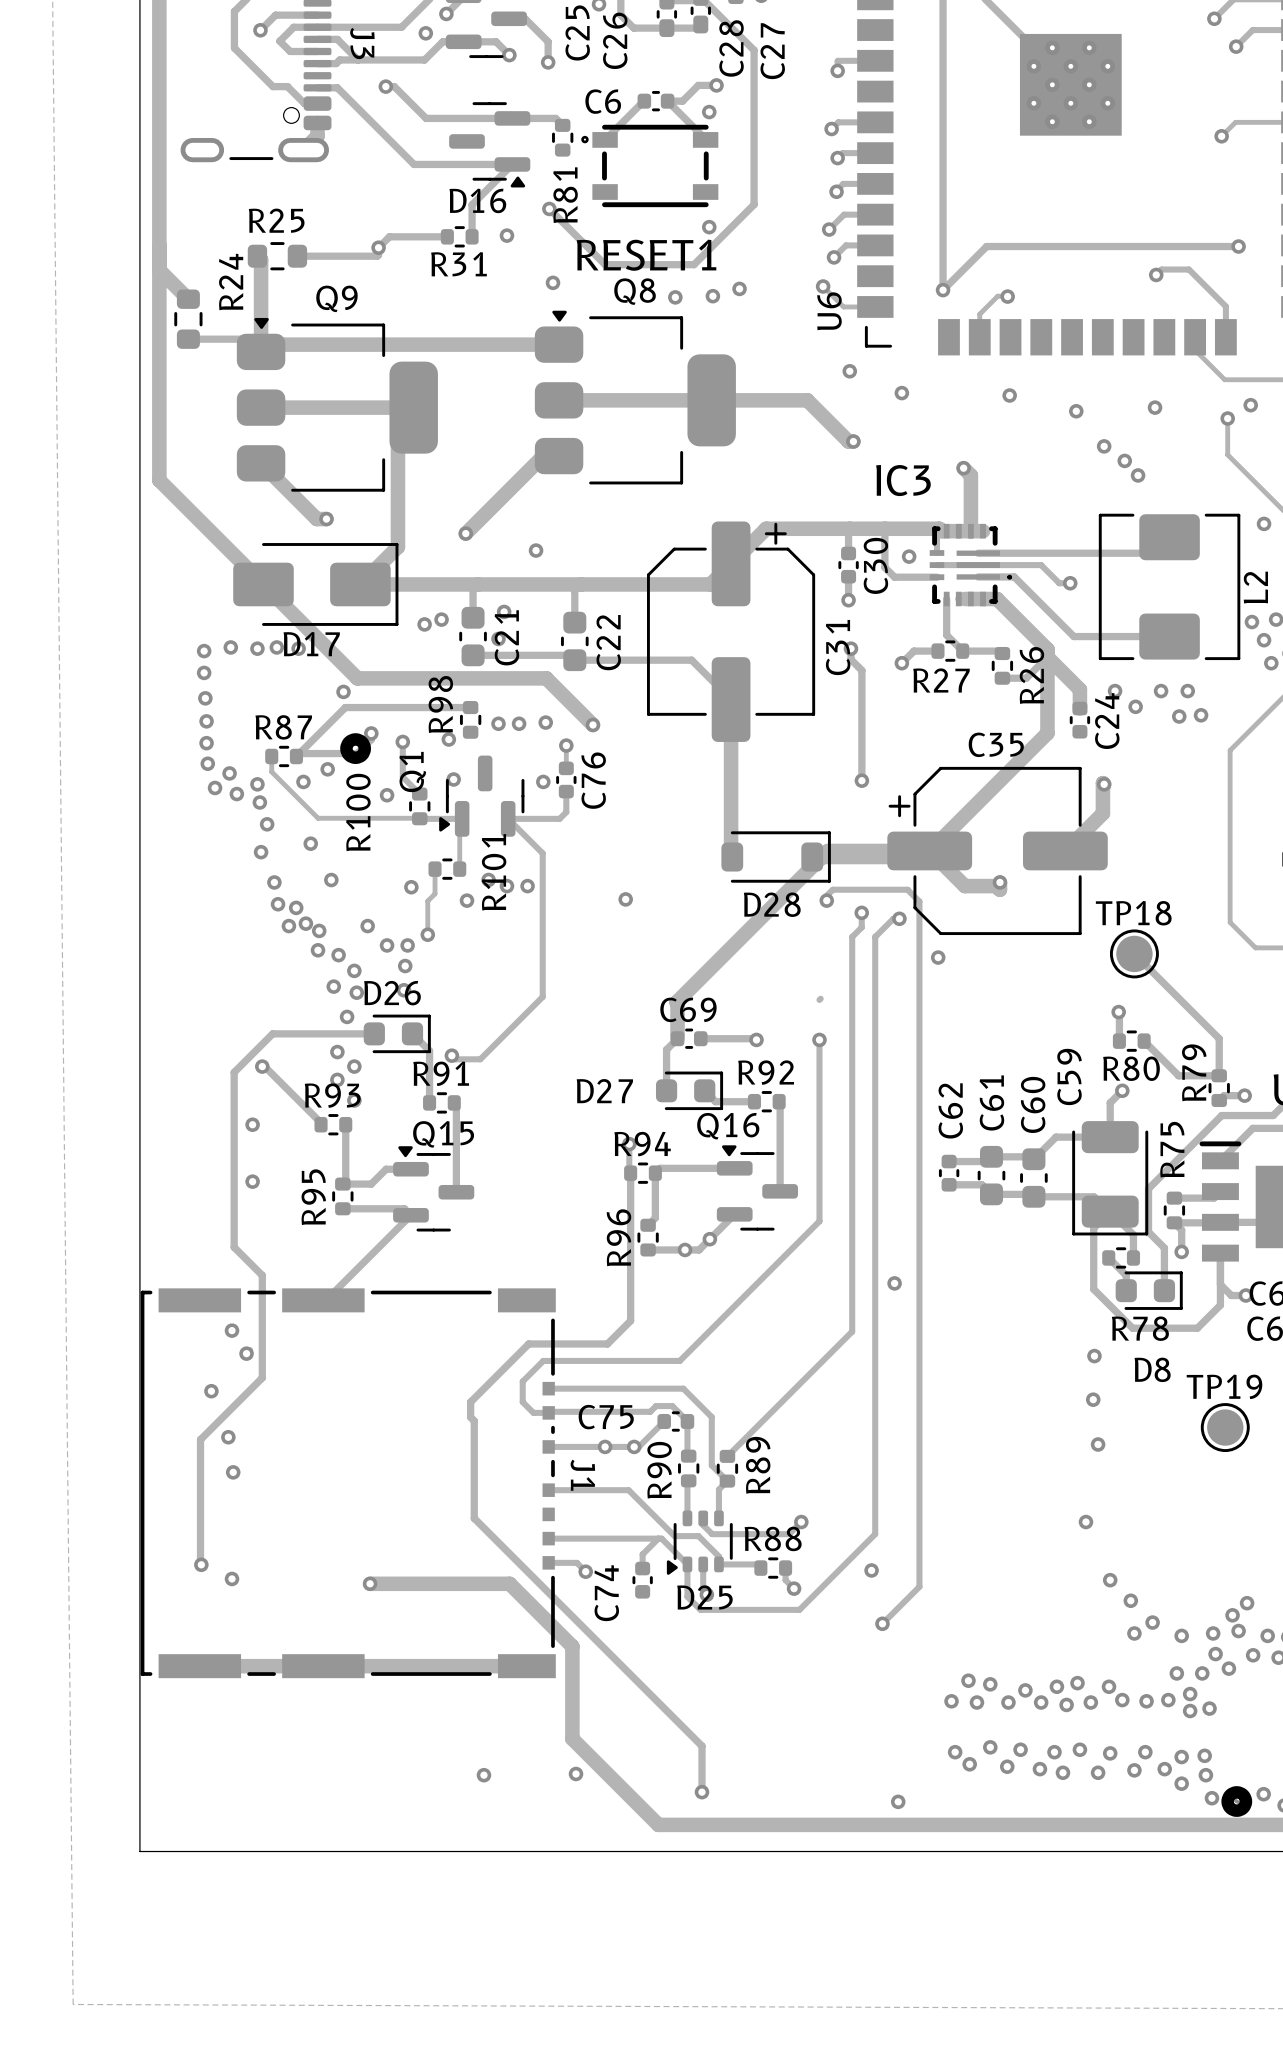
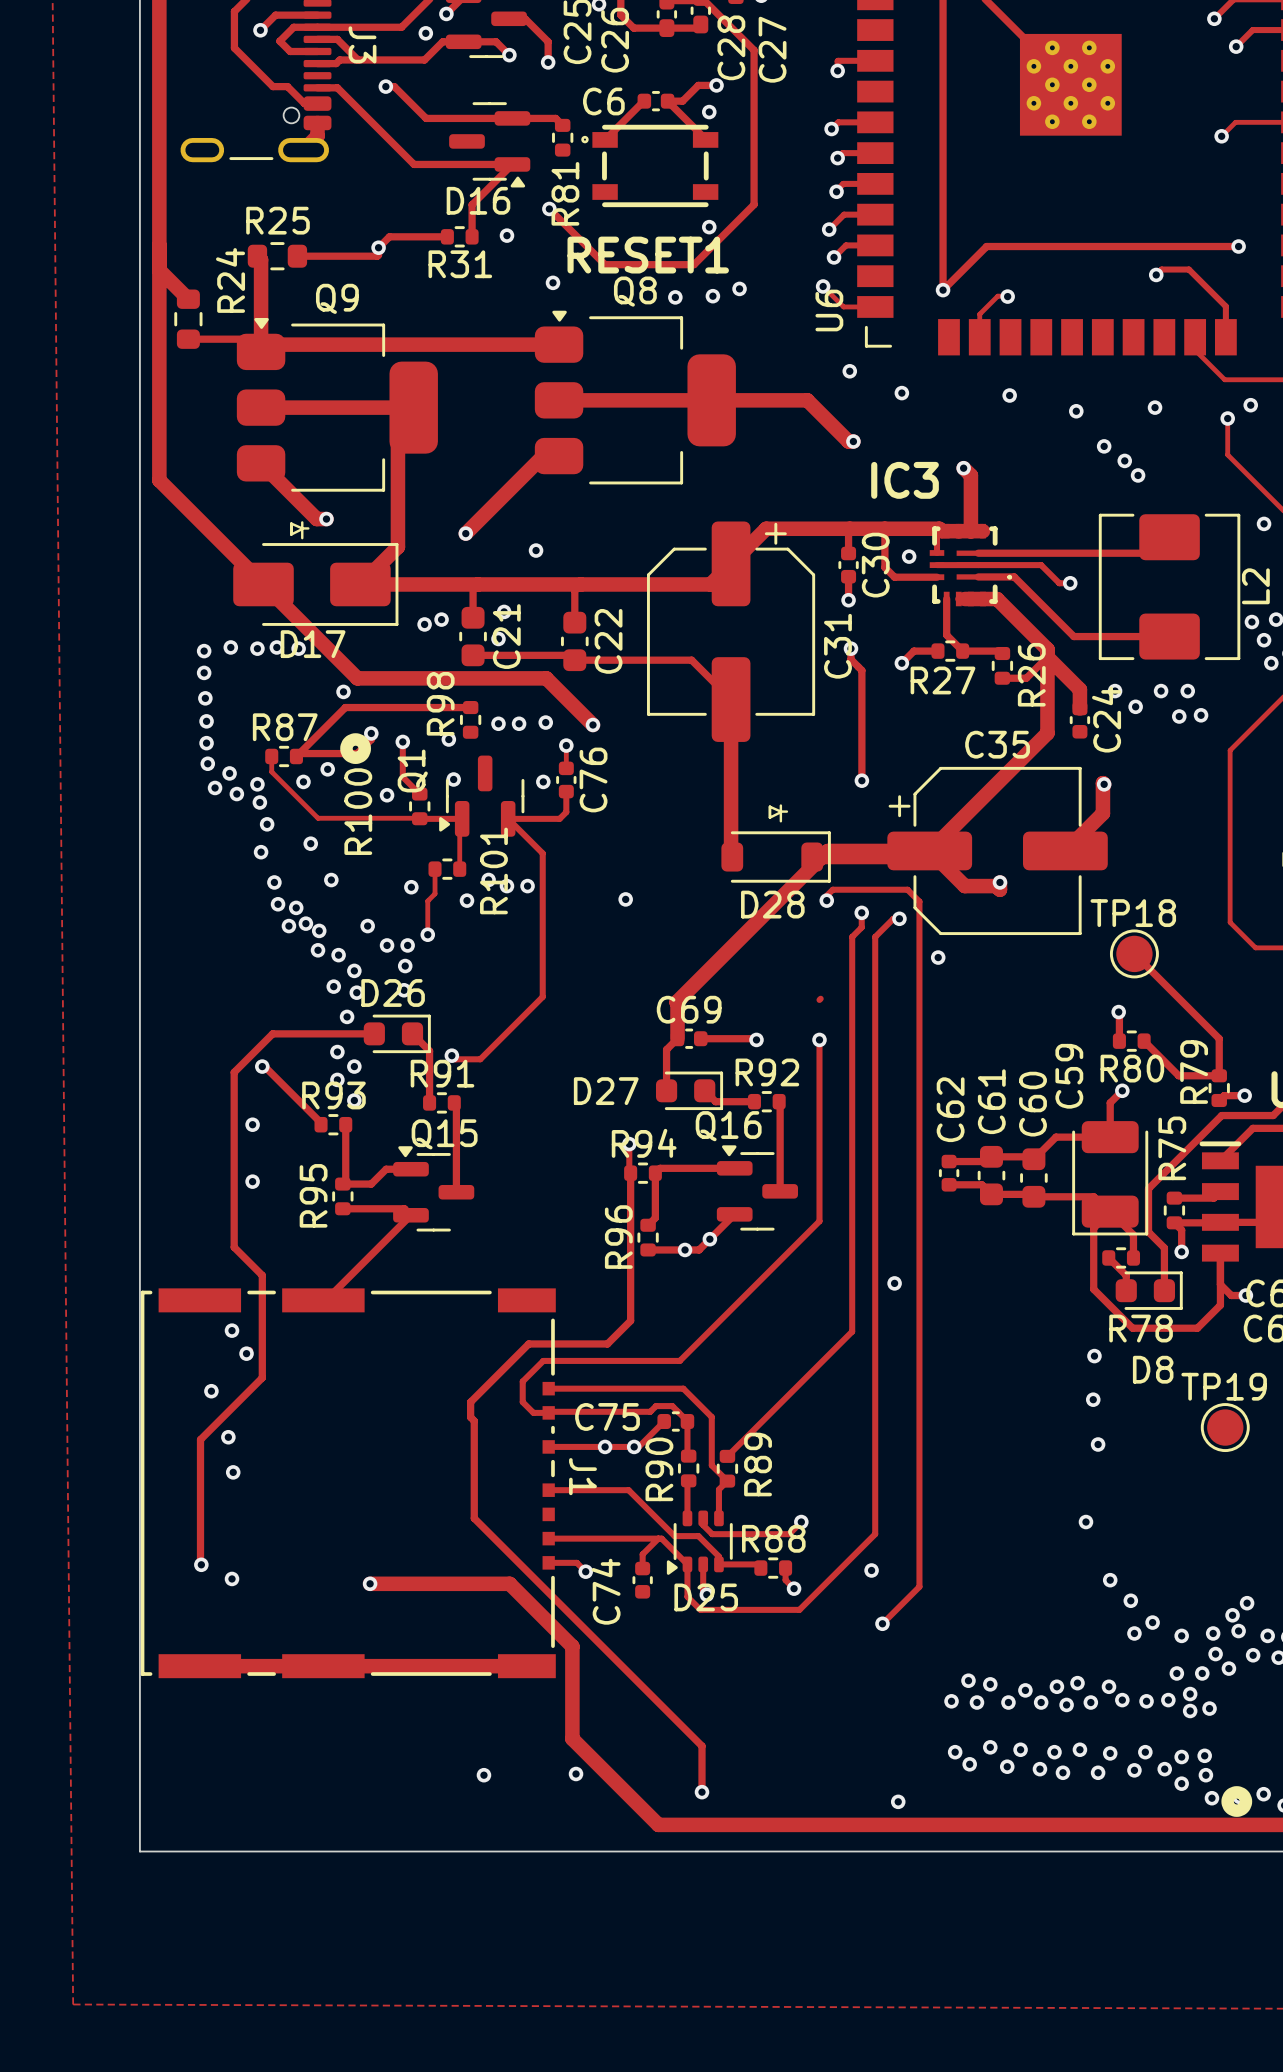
line: none -> (302, 522) (302, 528)
line: none -> (302, 528) (308, 528)
line: none -> (302, 528) (291, 523) (291, 534) (302, 529) (302, 538)
line: none -> (780, 805) (780, 811)
line: none -> (780, 811) (786, 811)
line: none -> (780, 811) (769, 806) (769, 817) (780, 812) (780, 821)

